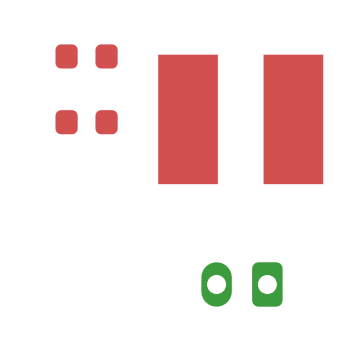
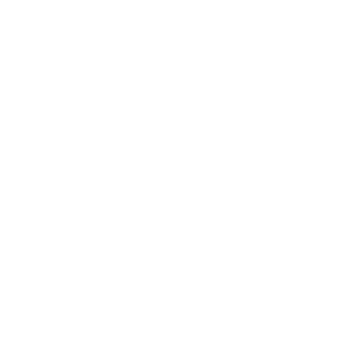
part: (86, 56) -> none
part: (240, 119) -> none
part: (86, 122) -> none
part: (241, 284) -> none

